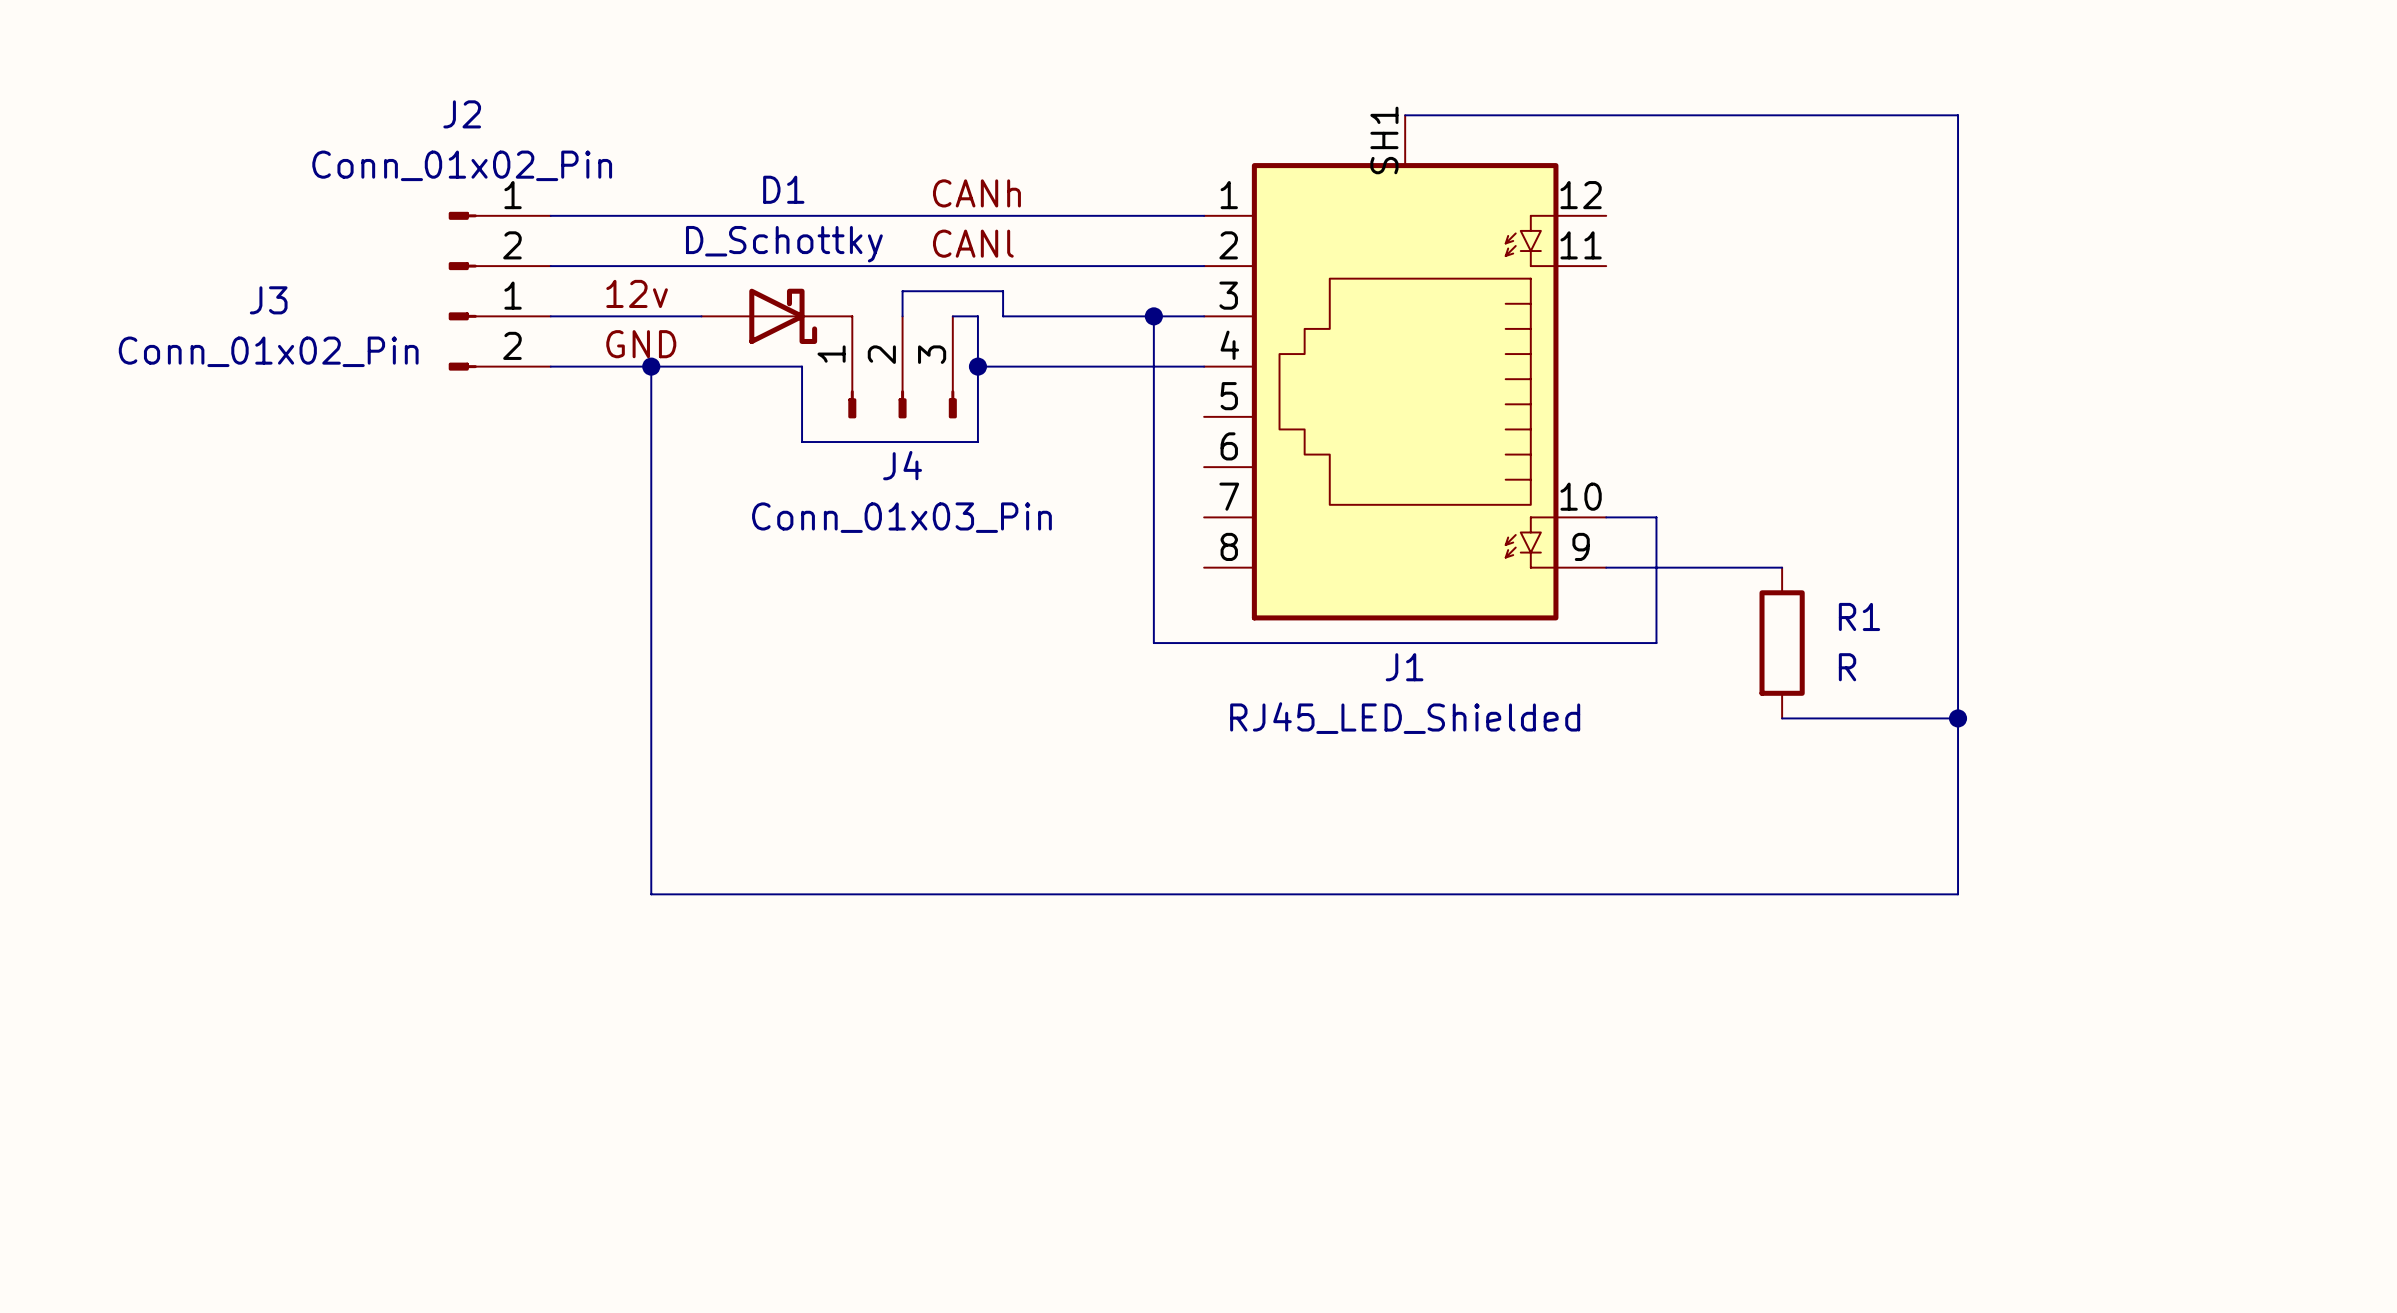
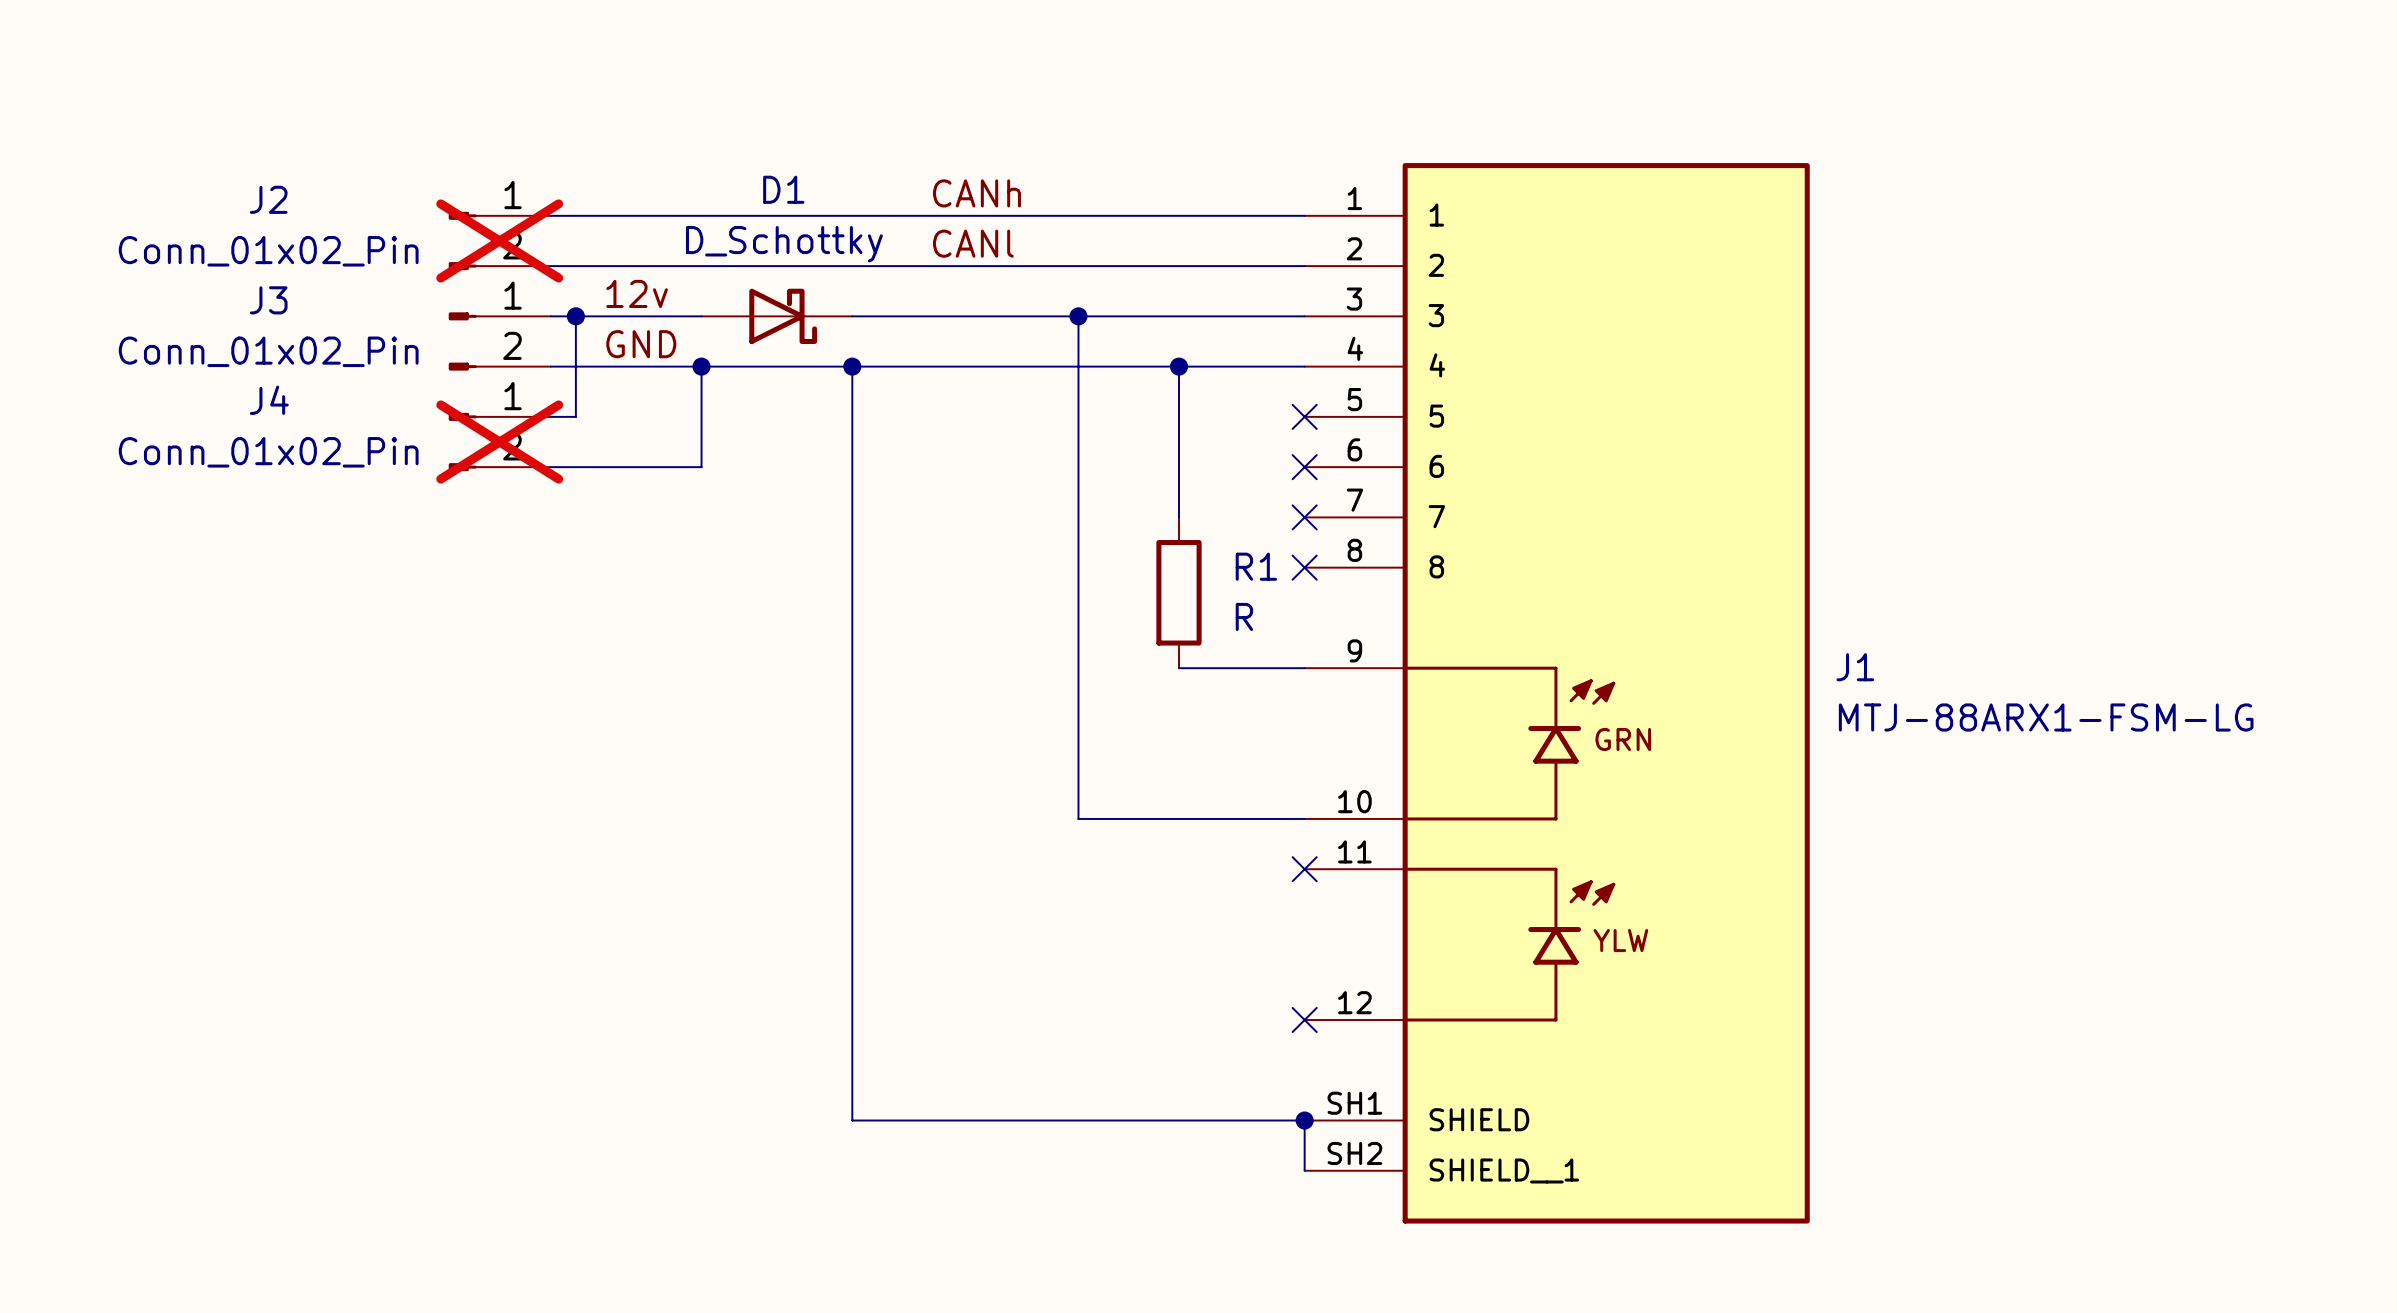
J2 name position: J2 (462, 114) -> J2 (268, 199)
J1 symbol: [1204, 115, 1607, 621] -> [1304, 163, 1810, 1224]
wire: (1405, 115) (1958, 115) (1958, 894) (651, 894) (651, 366) -> none
J2 value position: Conn_01x02_Pin (462, 165) -> Conn_01x02_Pin (268, 251)
J2 do-not-place cross: none -> (499, 240)
wire: none -> (575, 316) (575, 416) (550, 416)
junction: none -> (575, 316)
J4 symbol: [848, 316, 957, 419] -> [448, 412, 551, 472]
wire: none -> (852, 316) (952, 316)
wire: (902, 316) (902, 291) (1003, 291) (1003, 316) -> (977, 316) (1003, 316)
wire: (977, 316) (977, 442) (802, 442) (802, 366) -> (977, 366) (802, 366)
wire: none -> (1078, 316) (1078, 818) (1304, 818)
junction: none -> (1078, 316)
wire: (1153, 316) (1153, 643) (1656, 643) (1656, 517) (1606, 517) -> none
junction: (1153, 316) -> none
junction: (651, 366) -> none
wire: none -> (701, 366) (701, 467) (550, 467)
junction: none -> (701, 366)
wire: none -> (852, 366) (852, 1120) (1304, 1120) (1304, 1170)
junction: none -> (852, 366)
junction: (977, 366) -> none
wire: none -> (1178, 366) (1178, 517)
junction: none -> (1178, 366)
no-connect mark: none -> (1304, 416)
J4 do-not-place cross: none -> (499, 442)
J4 name position: J4 (902, 465) -> J4 (269, 400)
no-connect mark: none -> (1304, 467)
J4 value: Conn_01x03_Pin (901, 517) -> Conn_01x02_Pin (268, 452)
no-connect mark: none -> (1304, 517)
no-connect mark: none -> (1304, 567)
R1 position: (1782, 643) -> (1178, 592)
J1 name position: J1 (1404, 667) -> J1 (1855, 667)
wire: none -> (1178, 668) (1304, 668)
J1 value: RJ45_LED_Shielded (1405, 718) -> MTJ-88ARX1-FSM-LG (2046, 717)
wire: (1782, 718) (1958, 718) -> none
junction: (1958, 718) -> none
no-connect mark: none -> (1304, 869)
no-connect mark: none -> (1304, 1019)
junction: none -> (1304, 1120)

